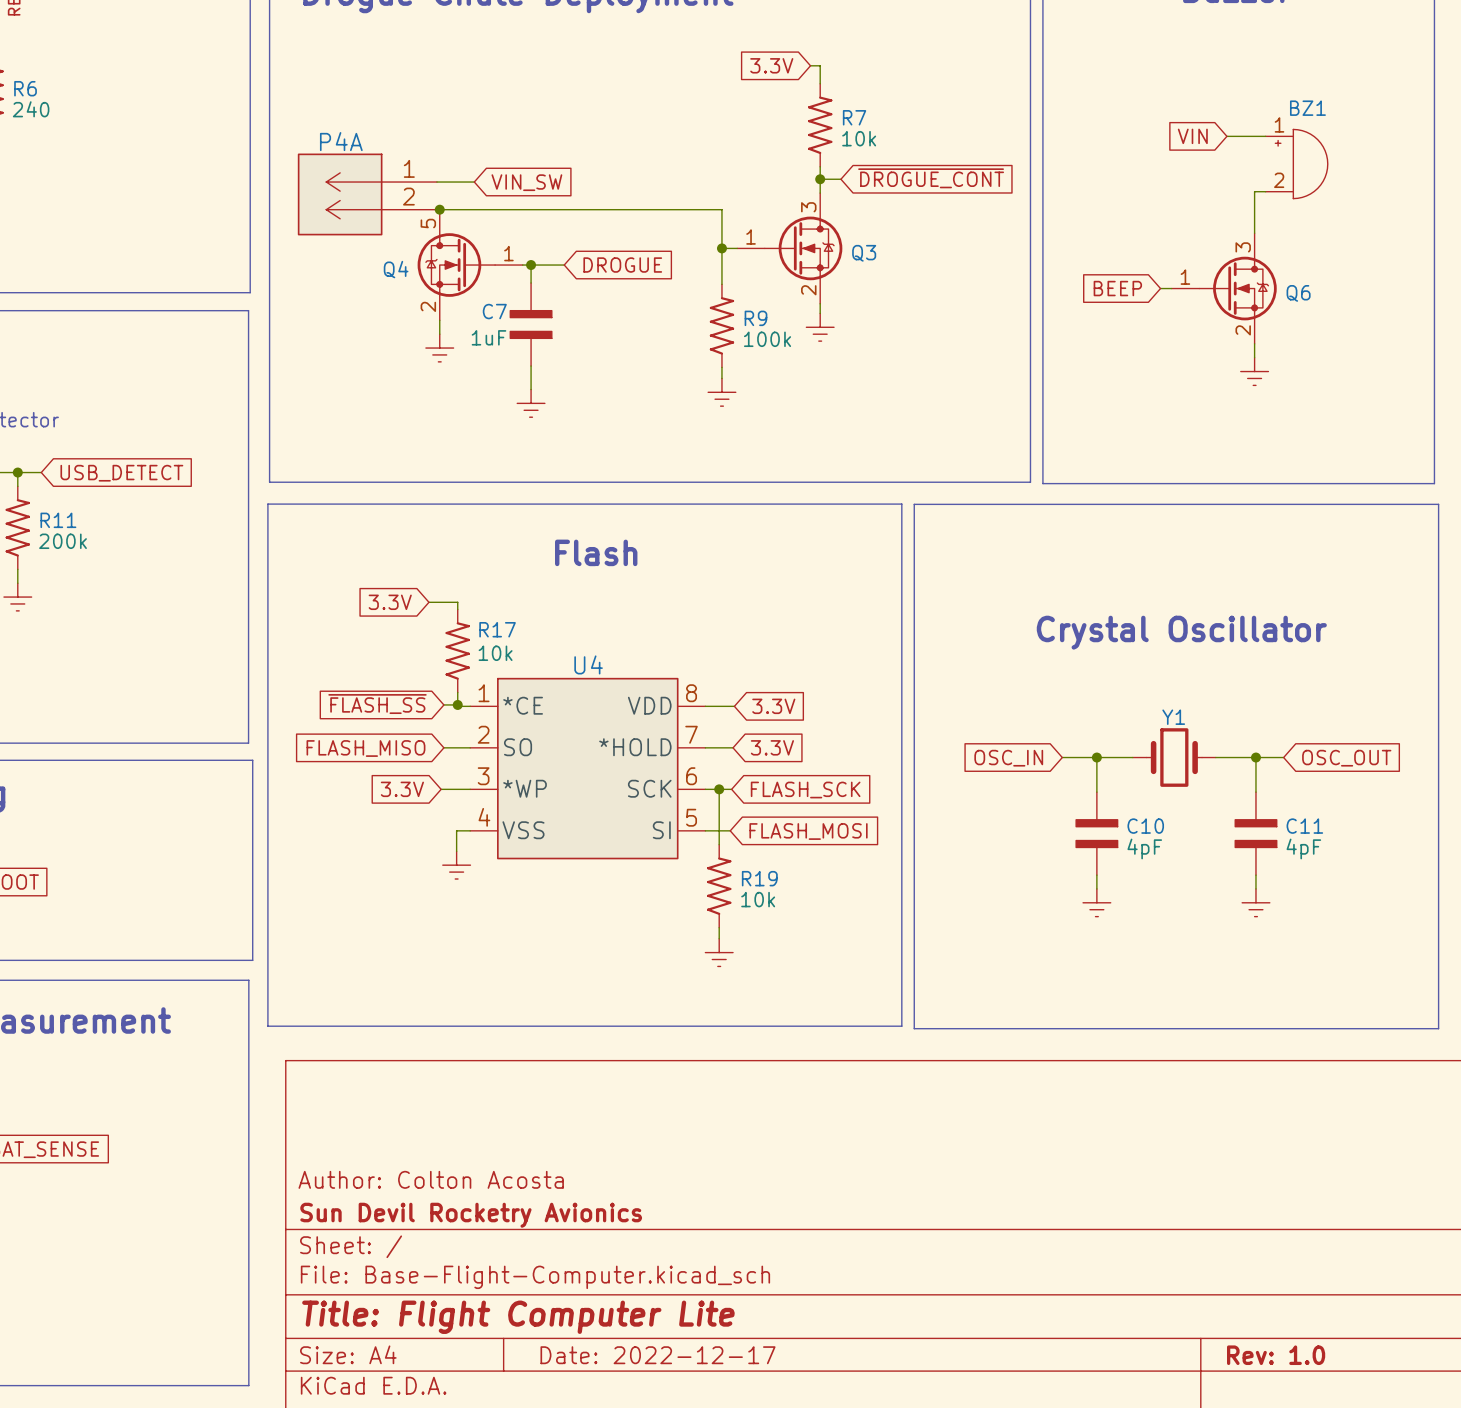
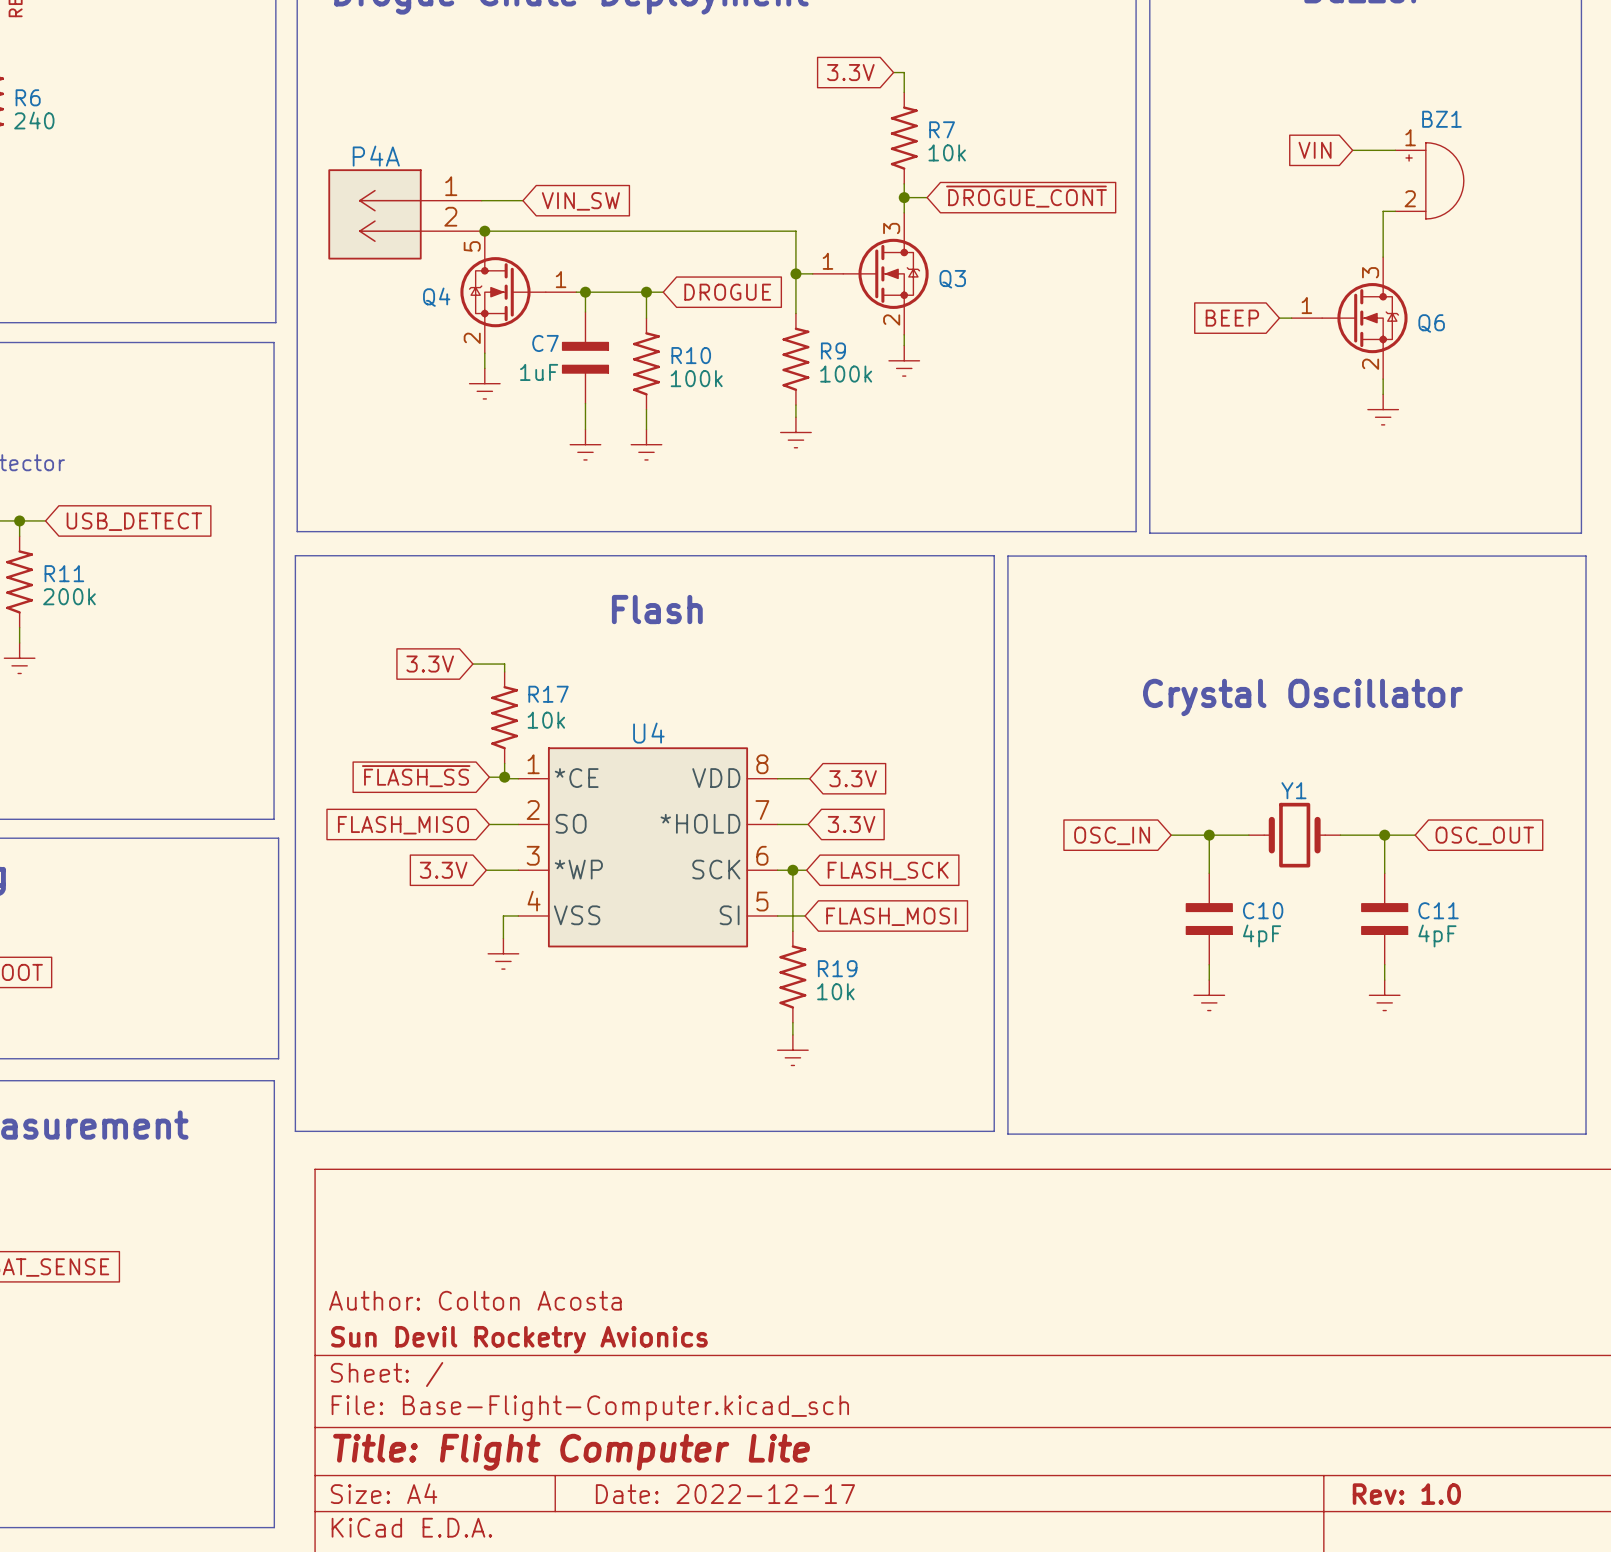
wire: none -> (622, 292) (663, 292)
wire: none -> (646, 292) (646, 318)
junction: none -> (646, 292)
global label position: DROGUE (622, 265) -> DROGUE (727, 292)
R10: none -> 100k (646, 363)
wire: none -> (646, 409) (646, 429)
power symbol: none -> (646, 444)

